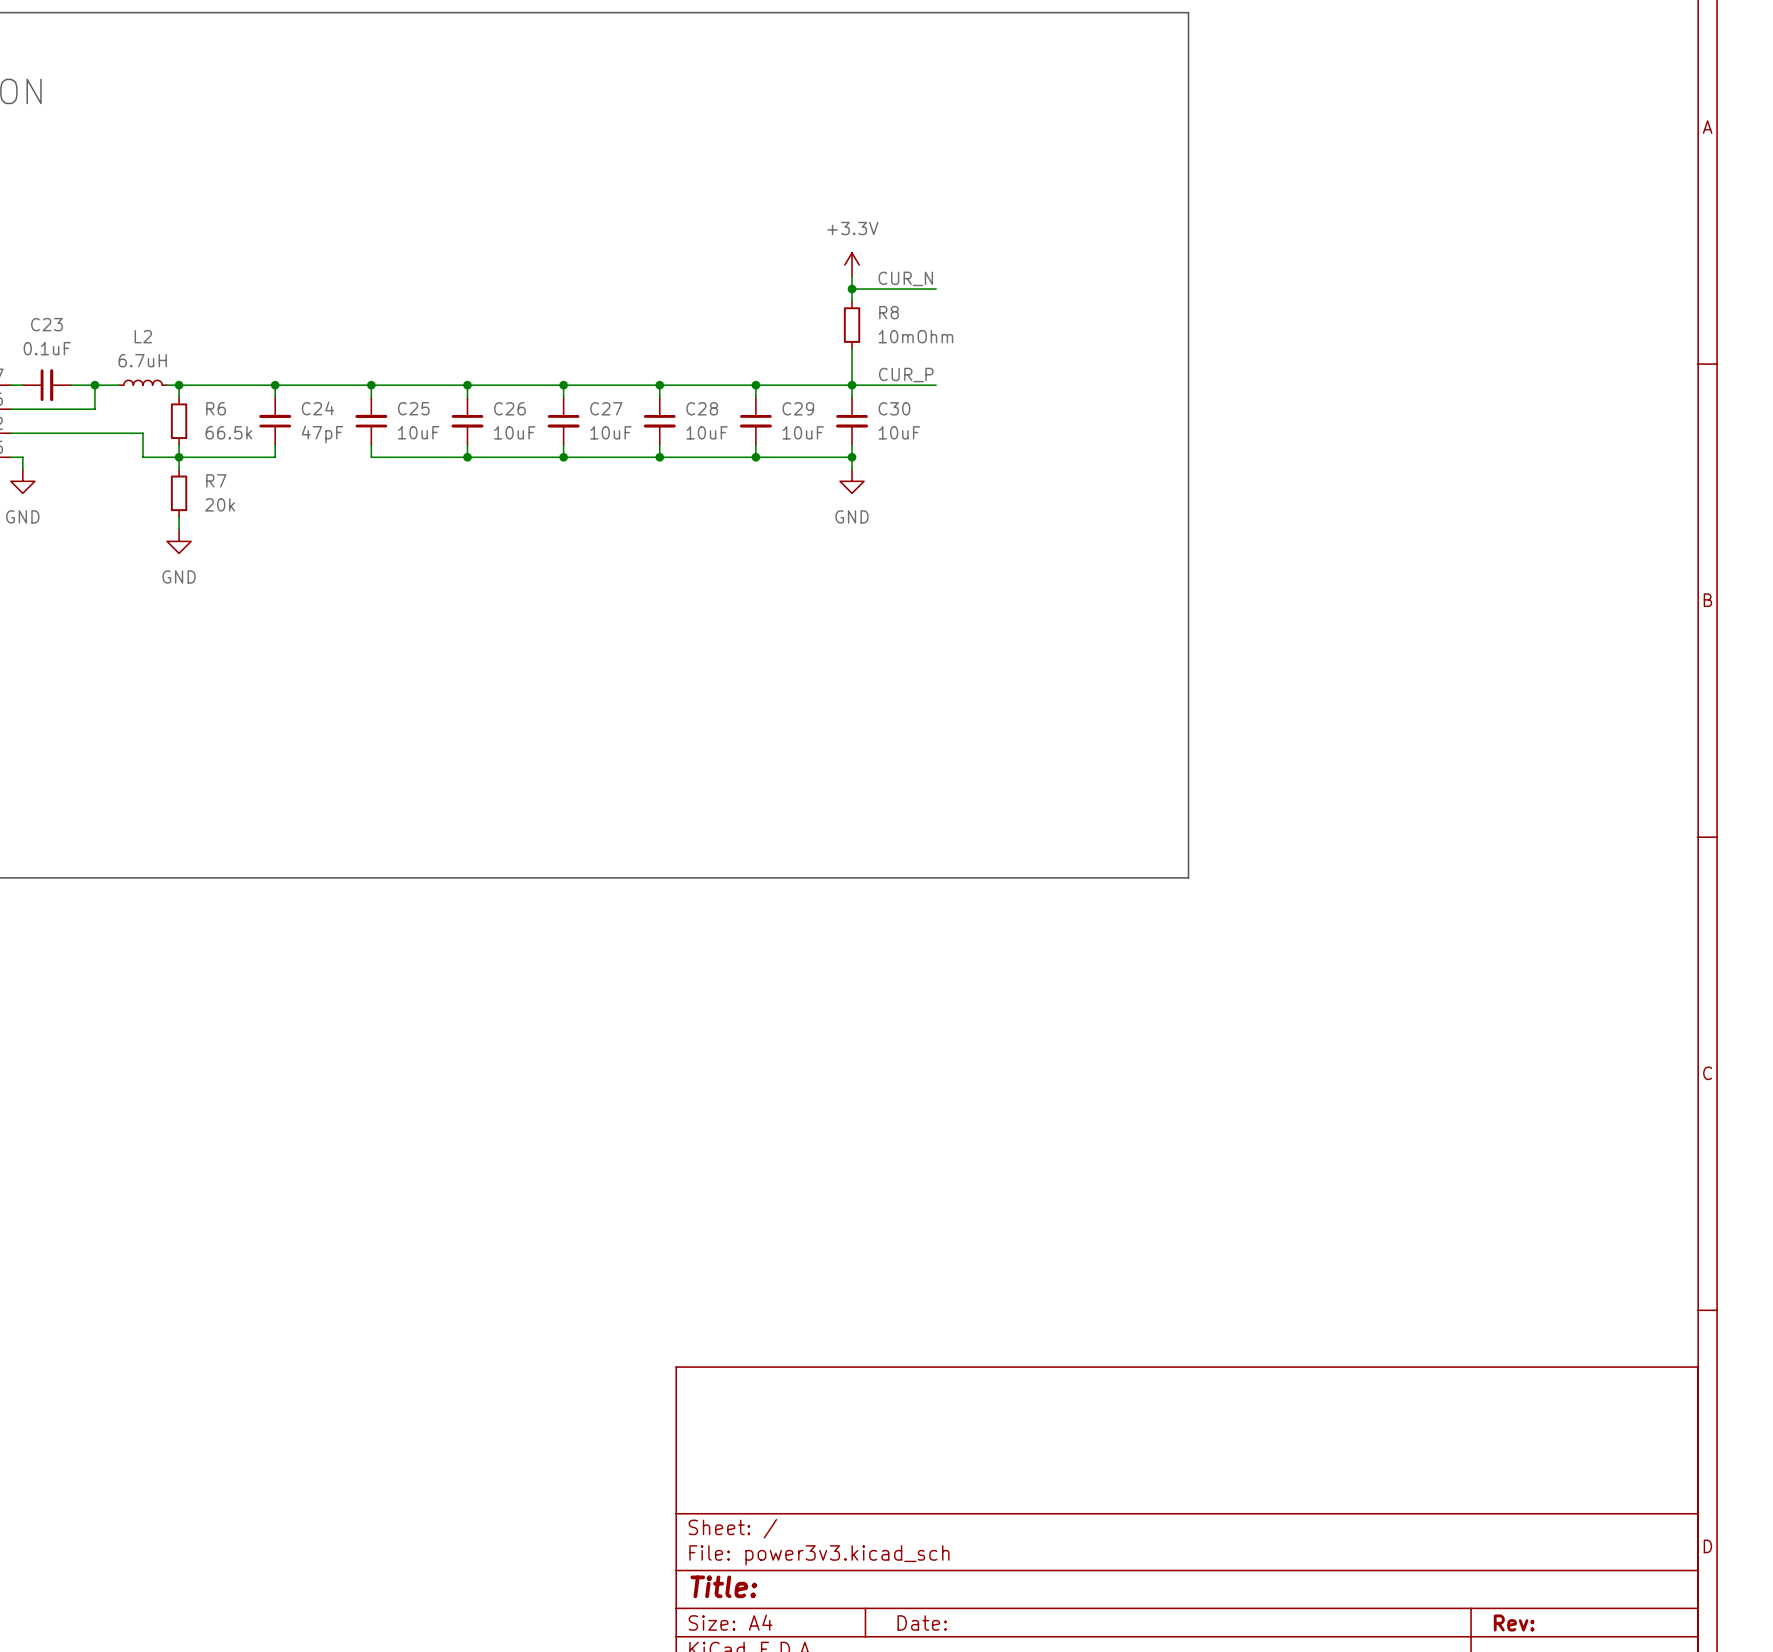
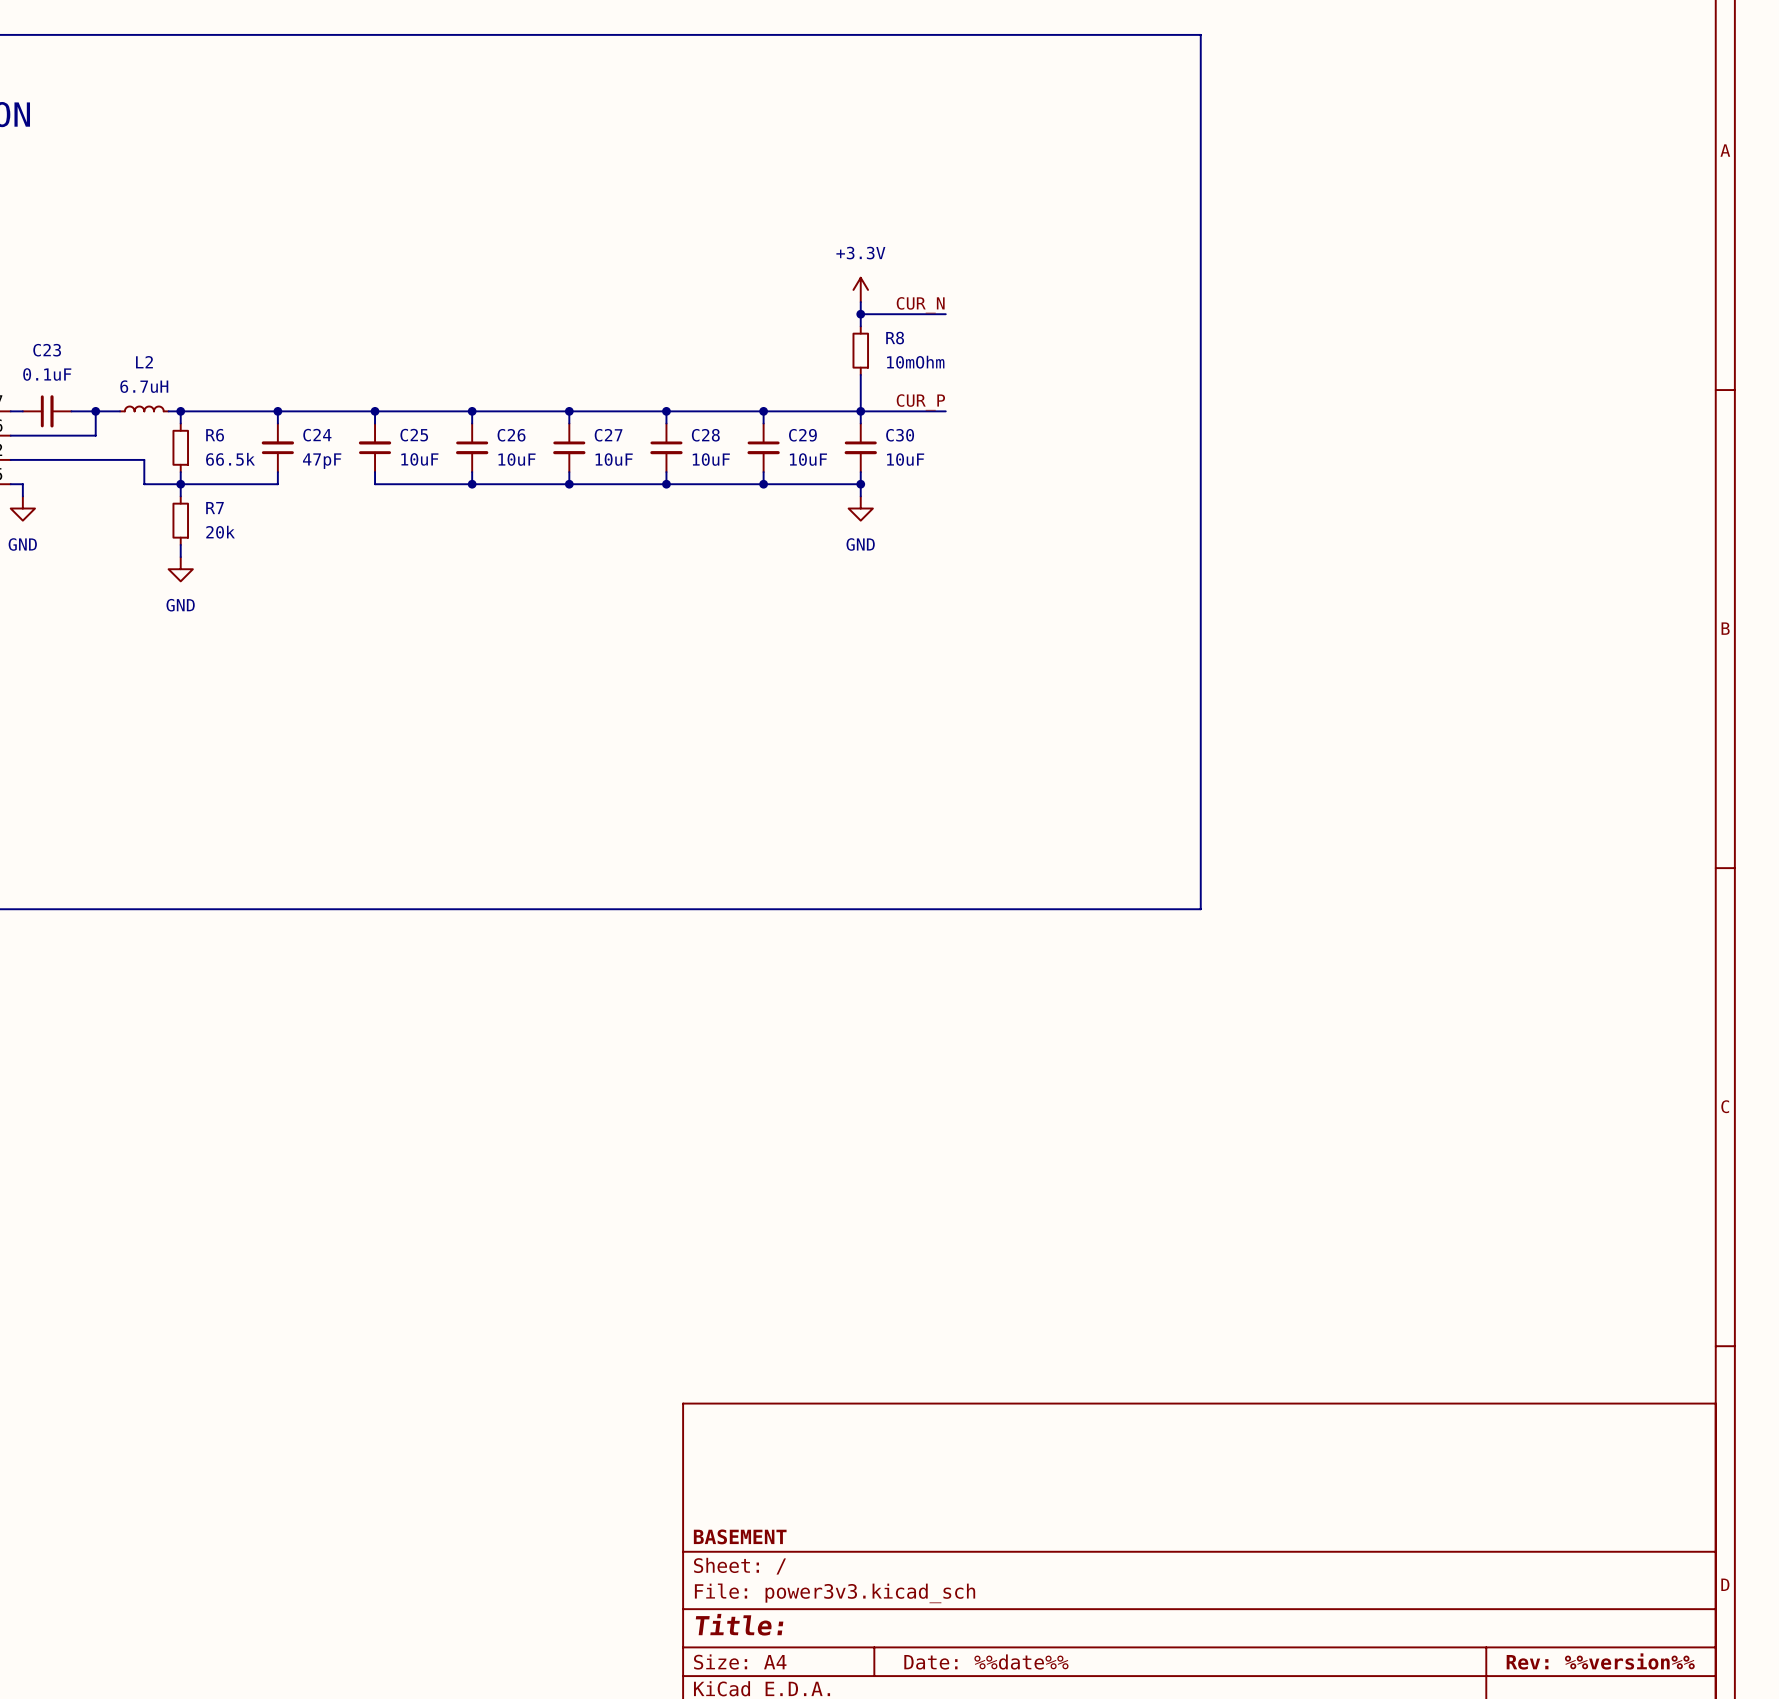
title block: none -> BASEMENT (740, 1536)
title block: Date: (922, 1622) -> Date: %%date%% (986, 1661)
title block: Rev: (1514, 1622) -> Rev: %%version%% (1600, 1661)

